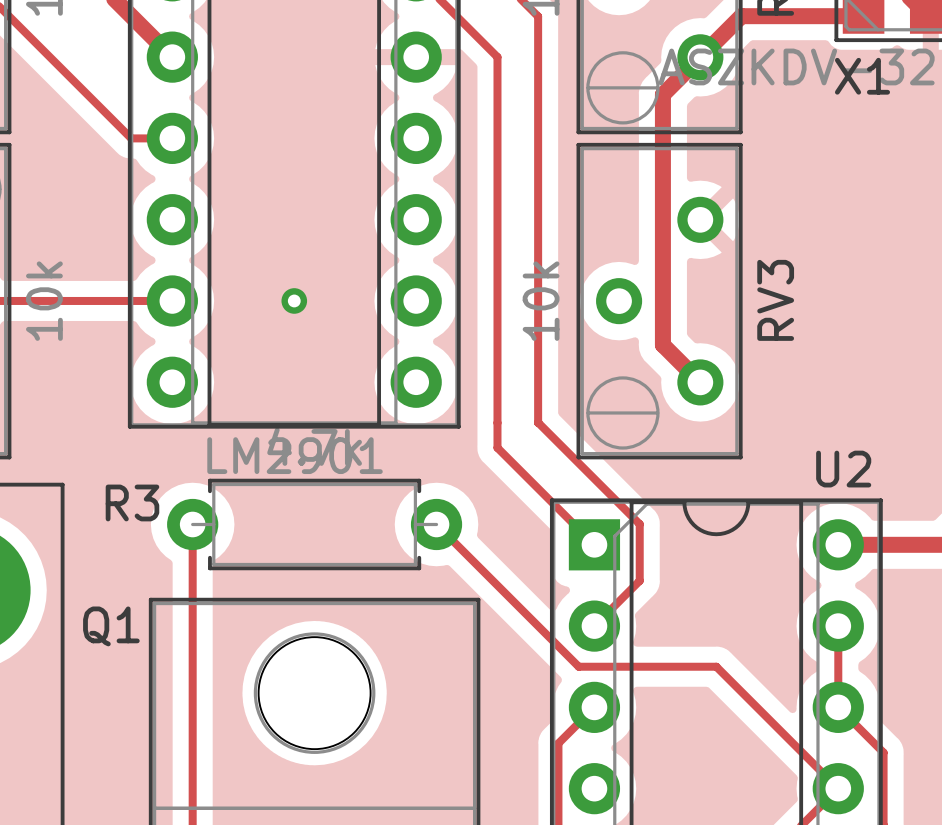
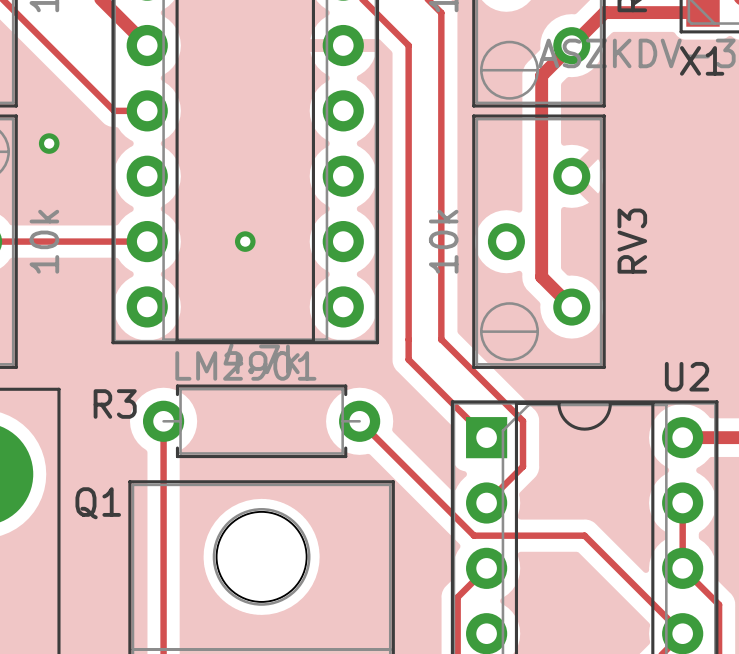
via: none -> (49, 143)

